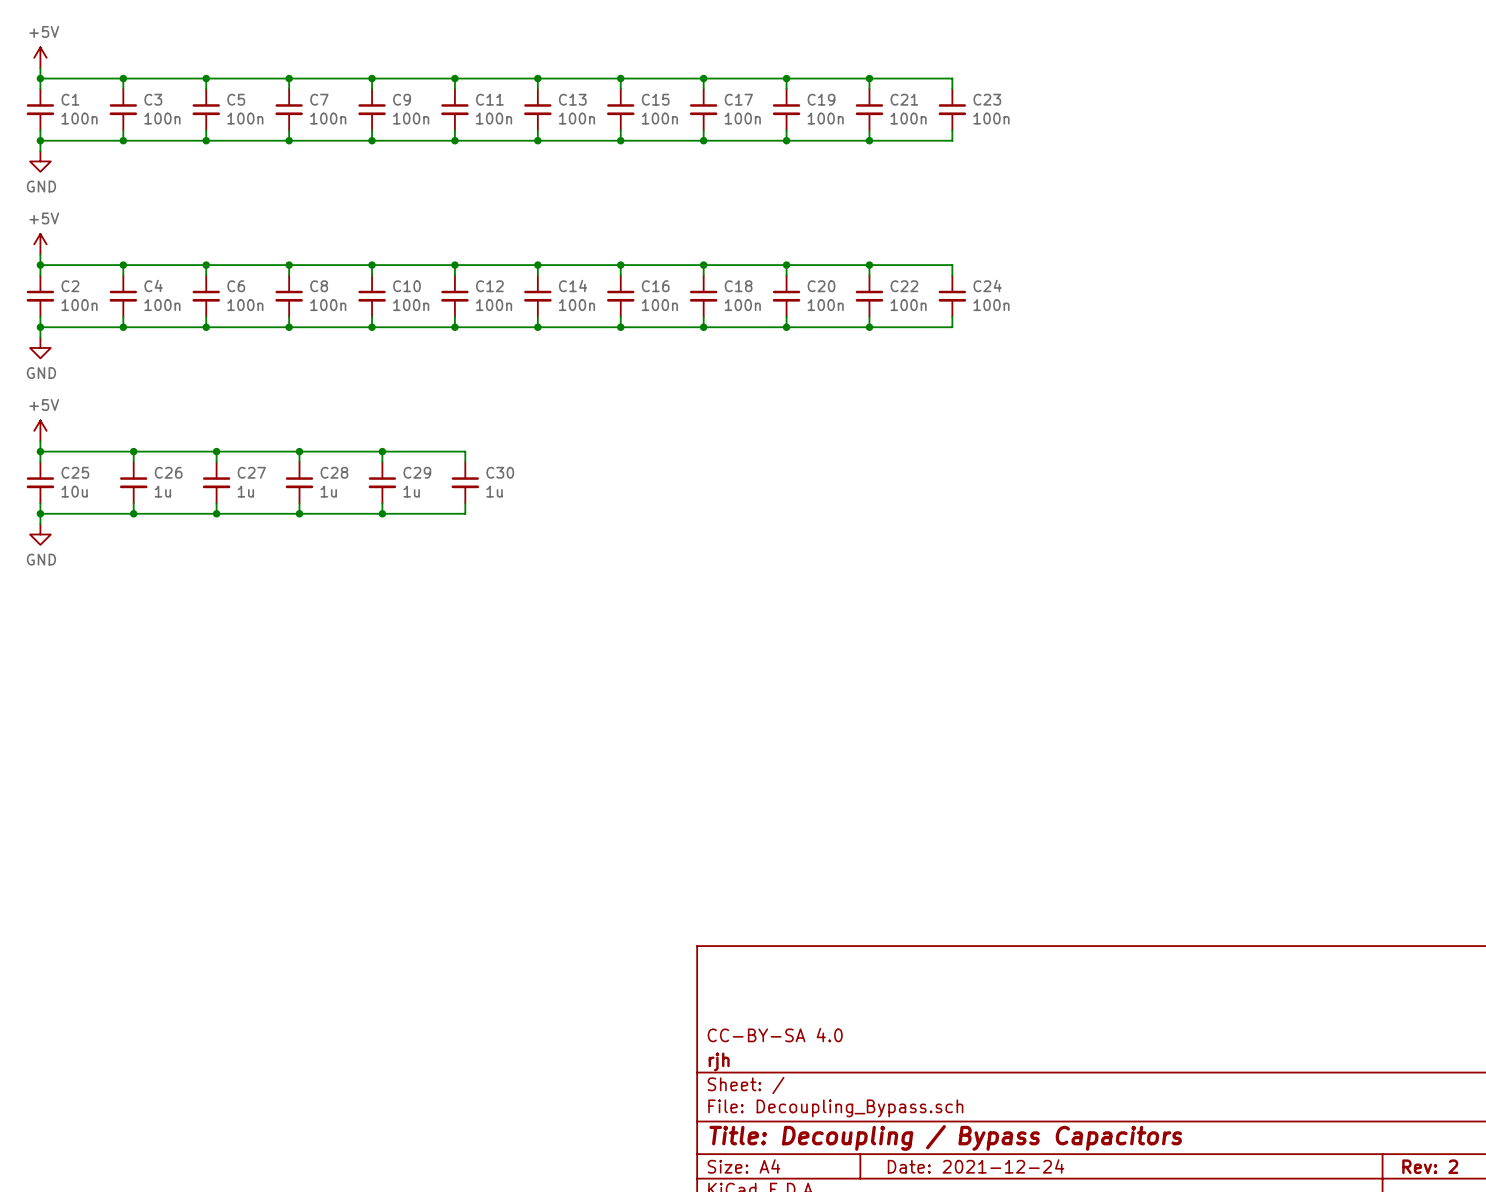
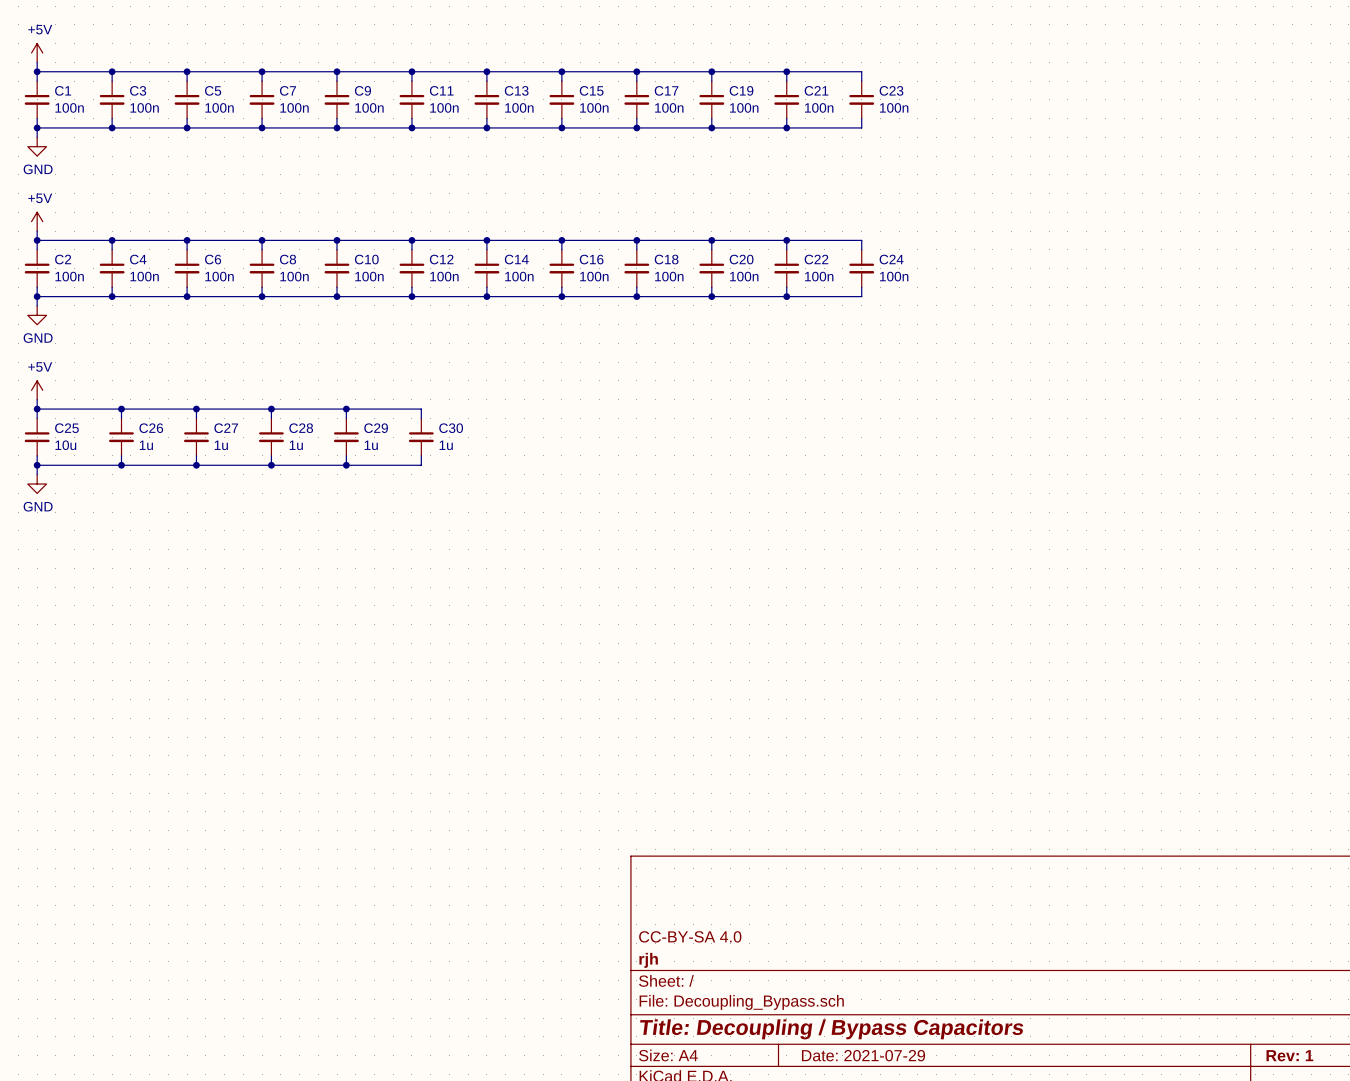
title block: Date: 2021-12-24 (975, 1166) -> Date: 2021-07-29 (863, 1055)
title block: Rev: 2 (1430, 1166) -> Rev: 1 (1289, 1055)

